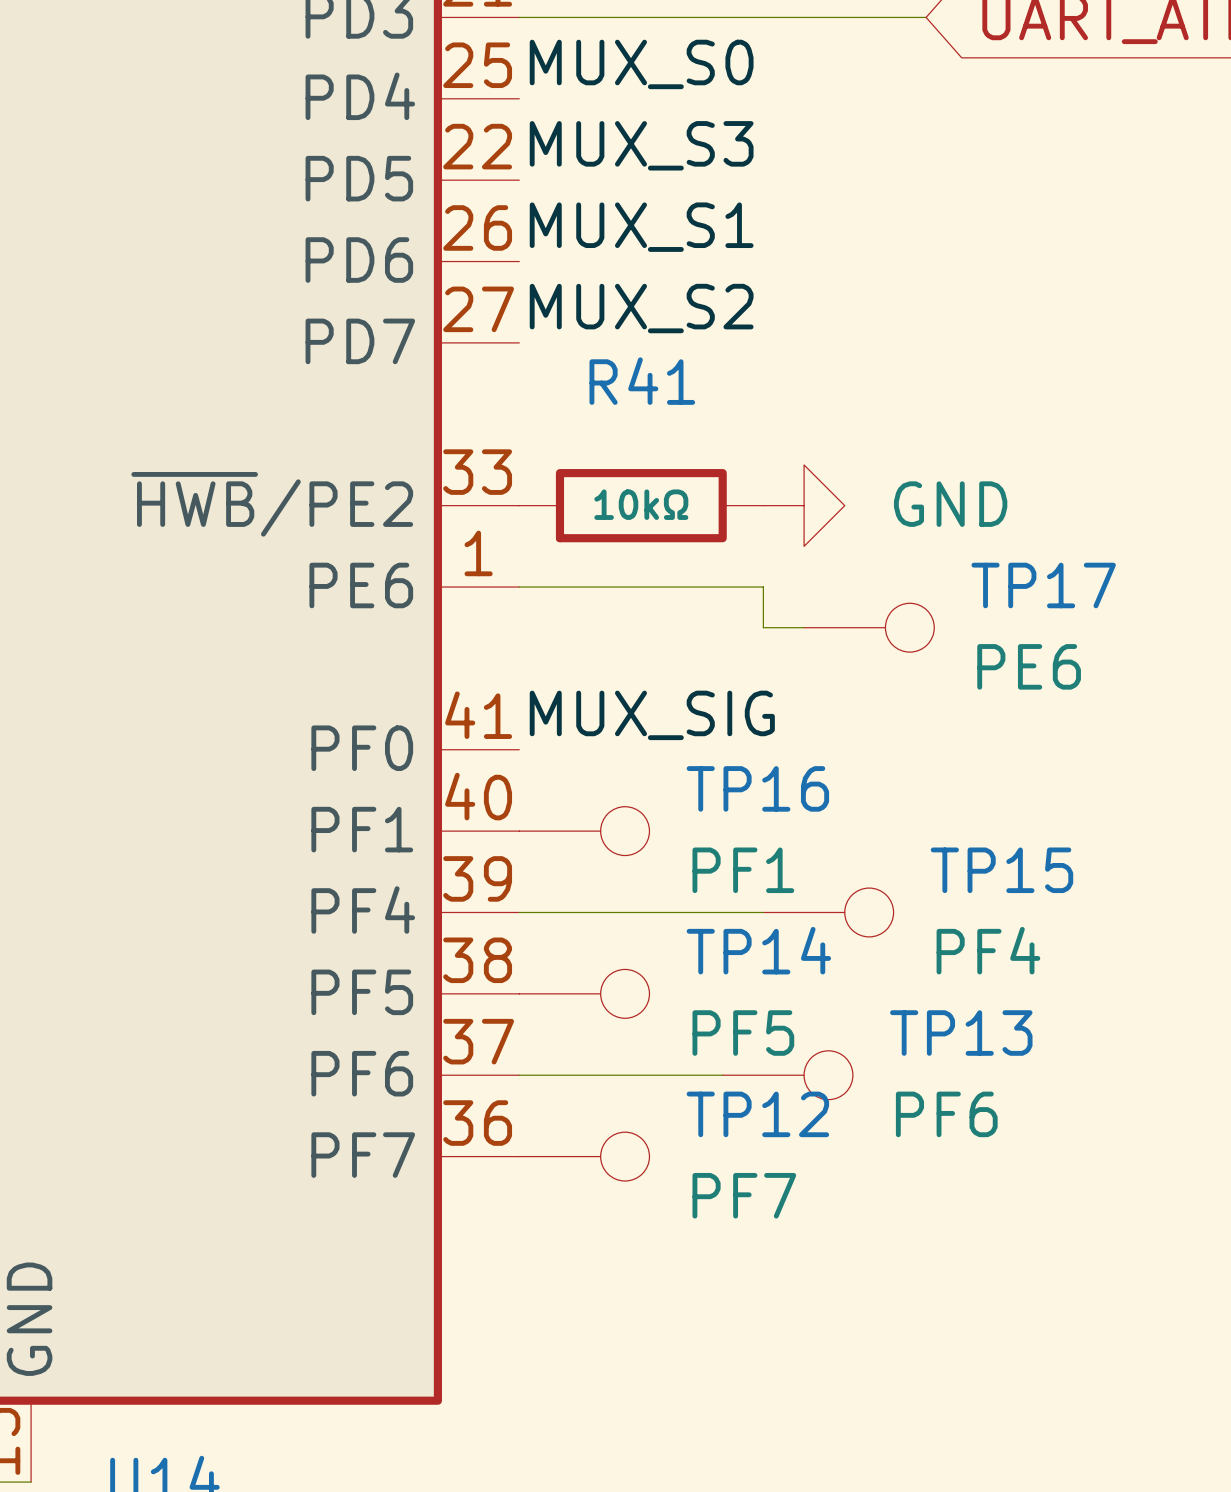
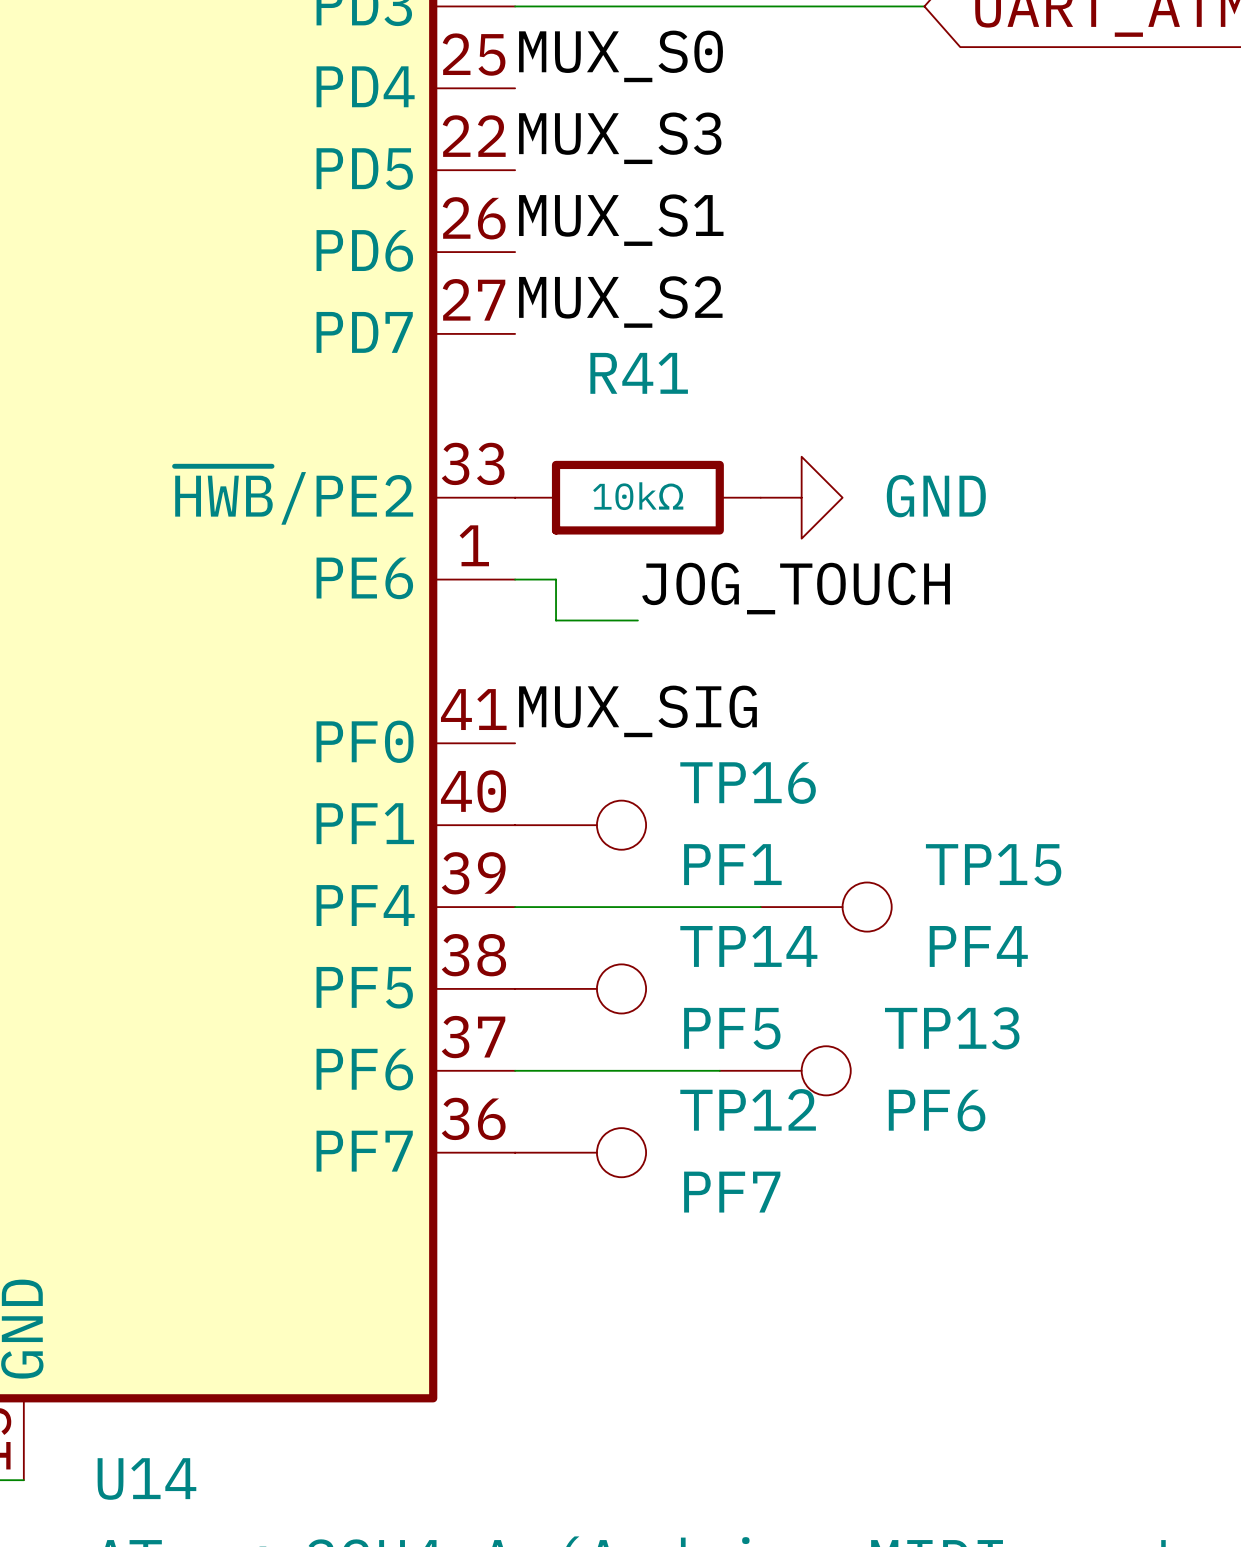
wire: (559, 587) (763, 587) (763, 627) (804, 627) -> (556, 579) (556, 620) (637, 620)
label: none -> JOG_TOUCH (796, 588)
TP17: PE6 (869, 627) -> none

